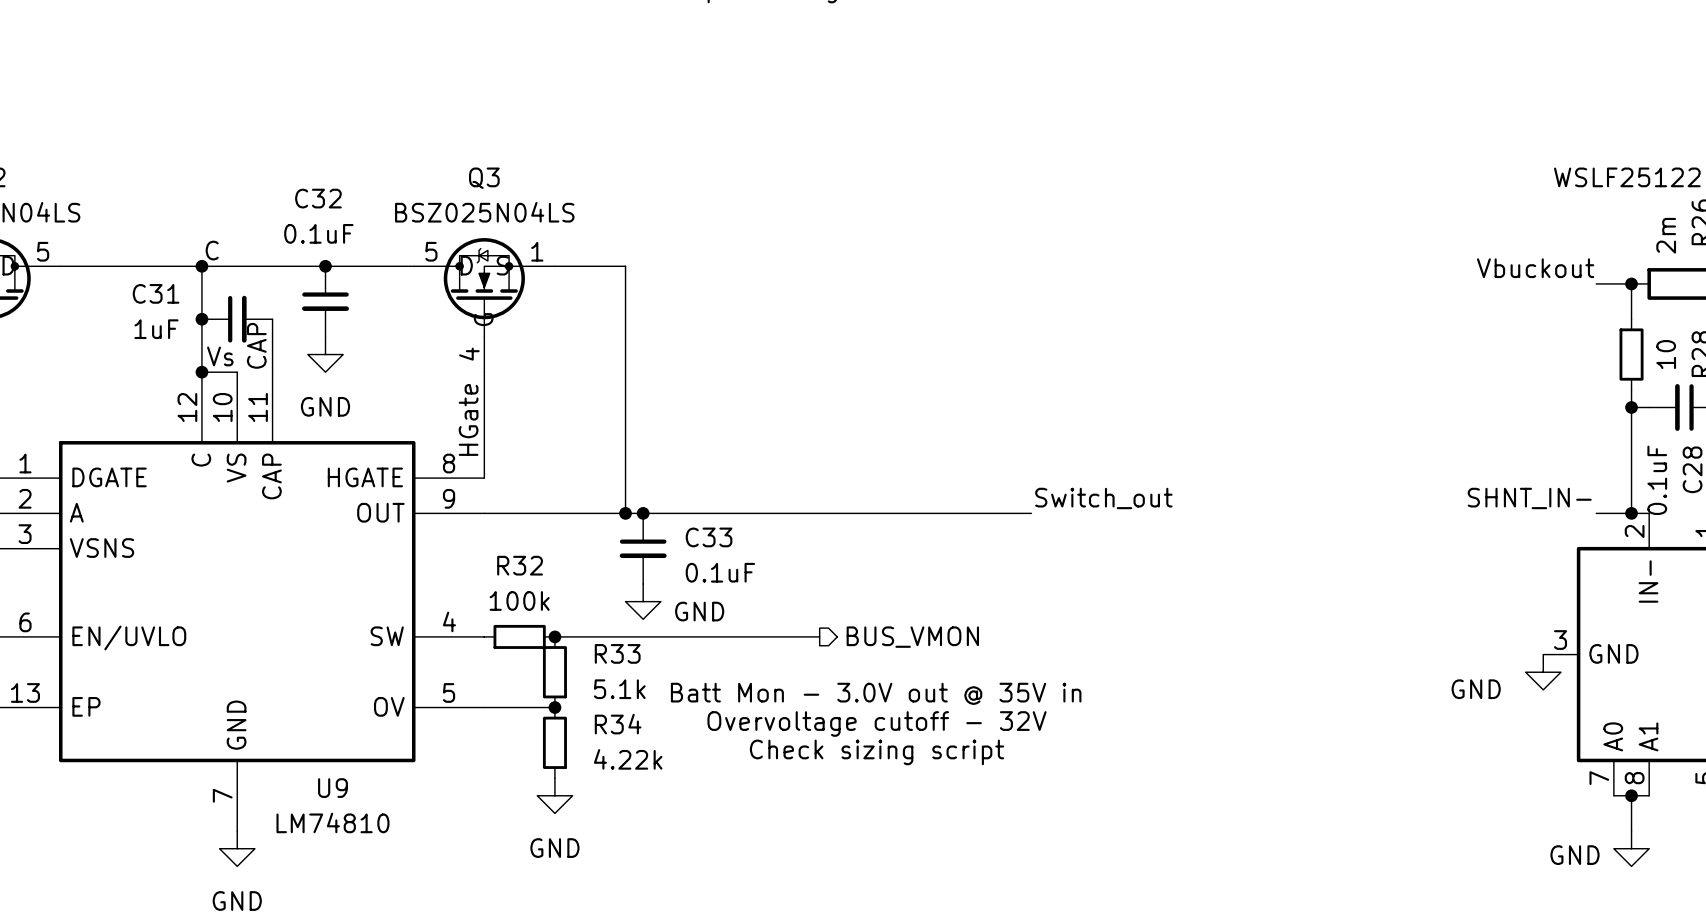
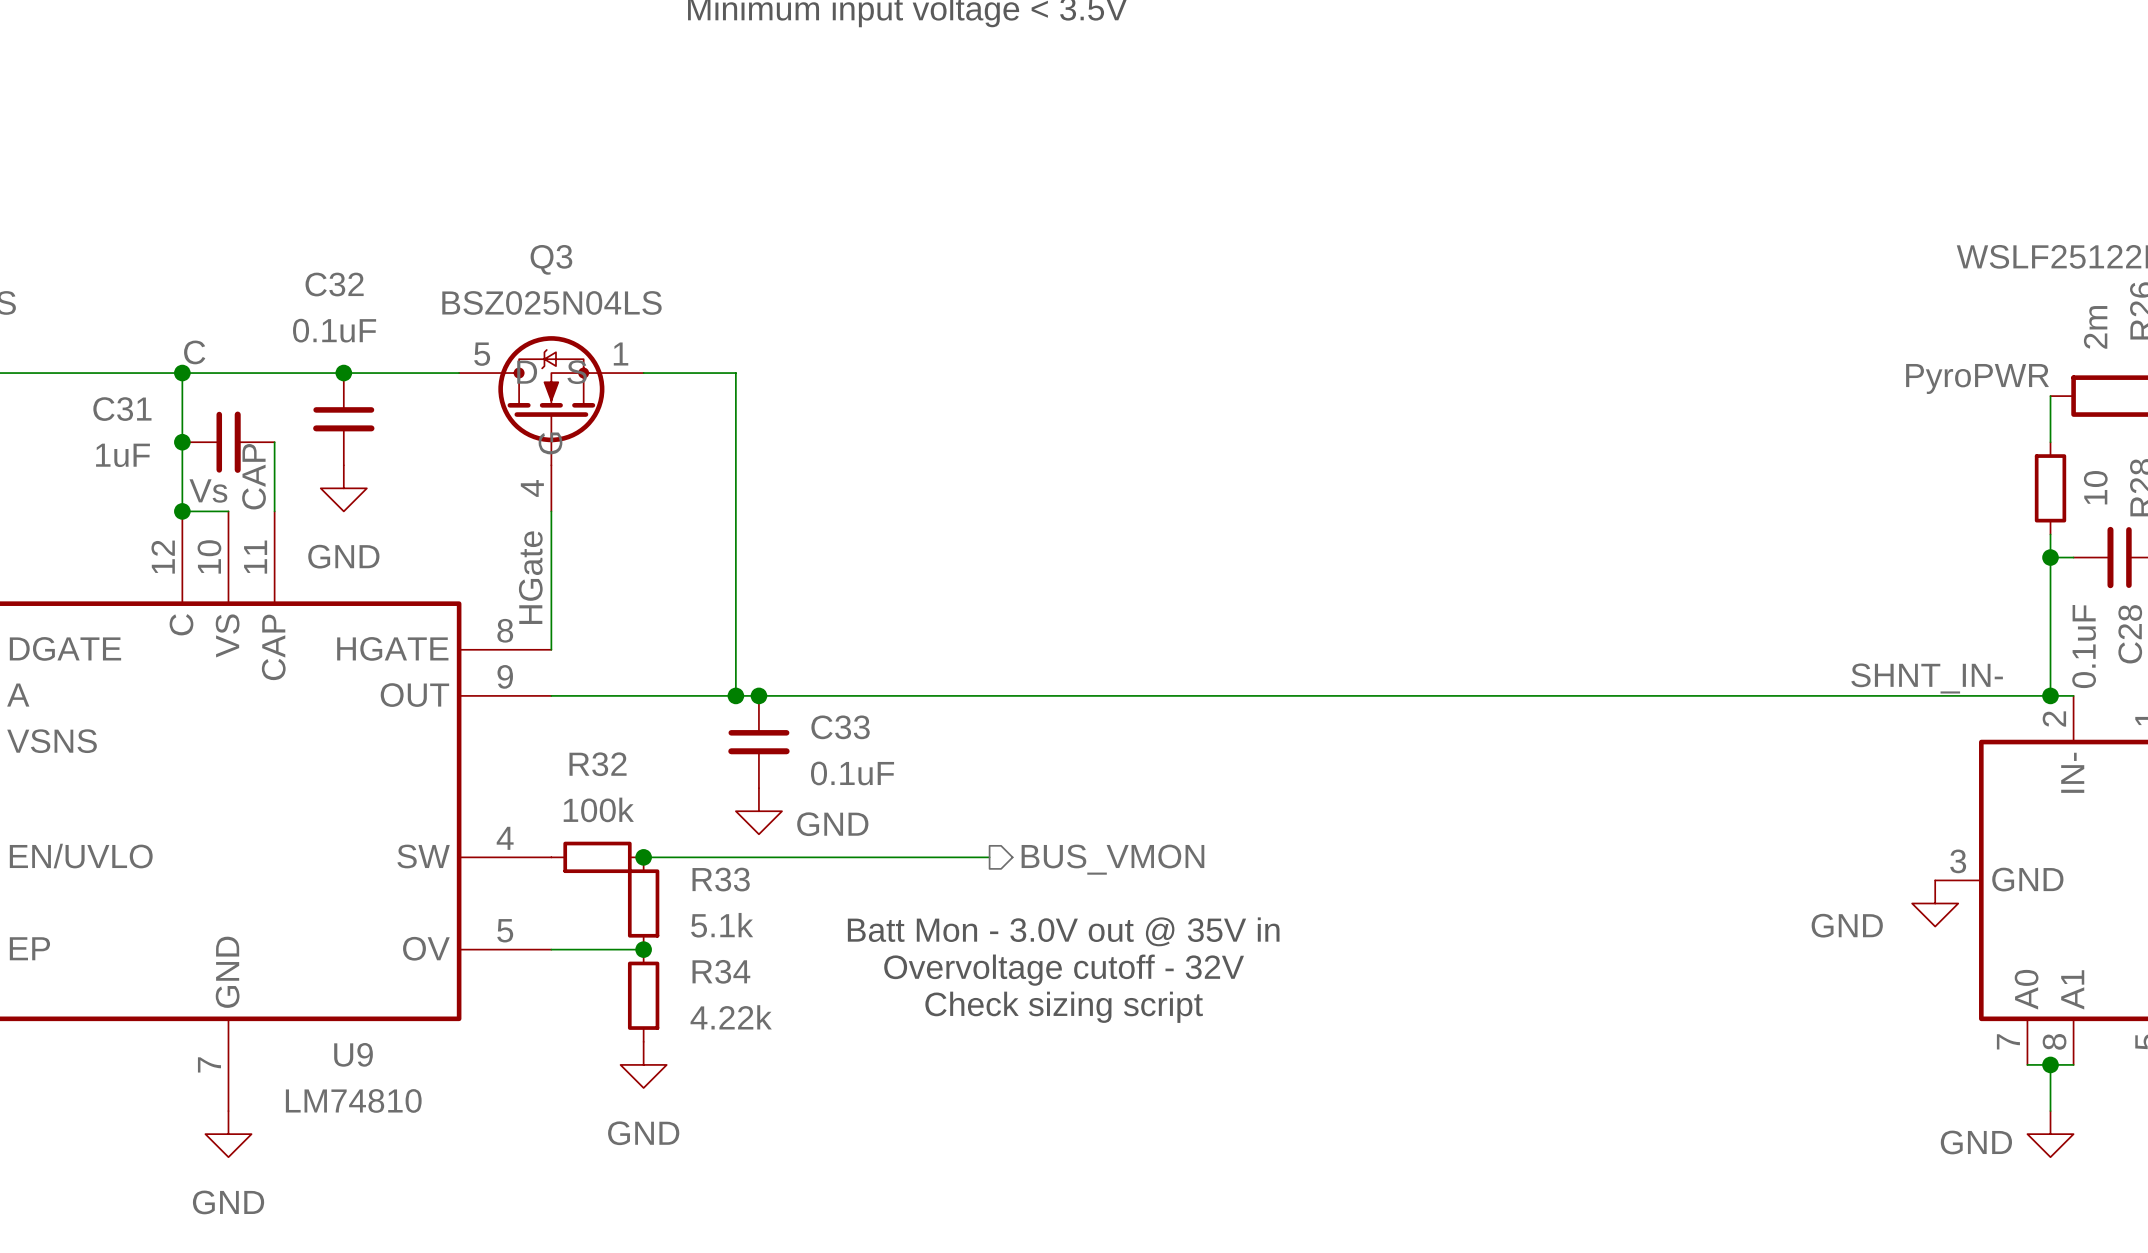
label: Vbuckout (1535, 268) -> none
label: none -> PyroPWR (1977, 378)
wire: (1596, 283) (1631, 283) -> none
junction: (1631, 283) -> none
label: Switch_out (1103, 498) -> none
wire: none -> (1266, 695) (2004, 695)

